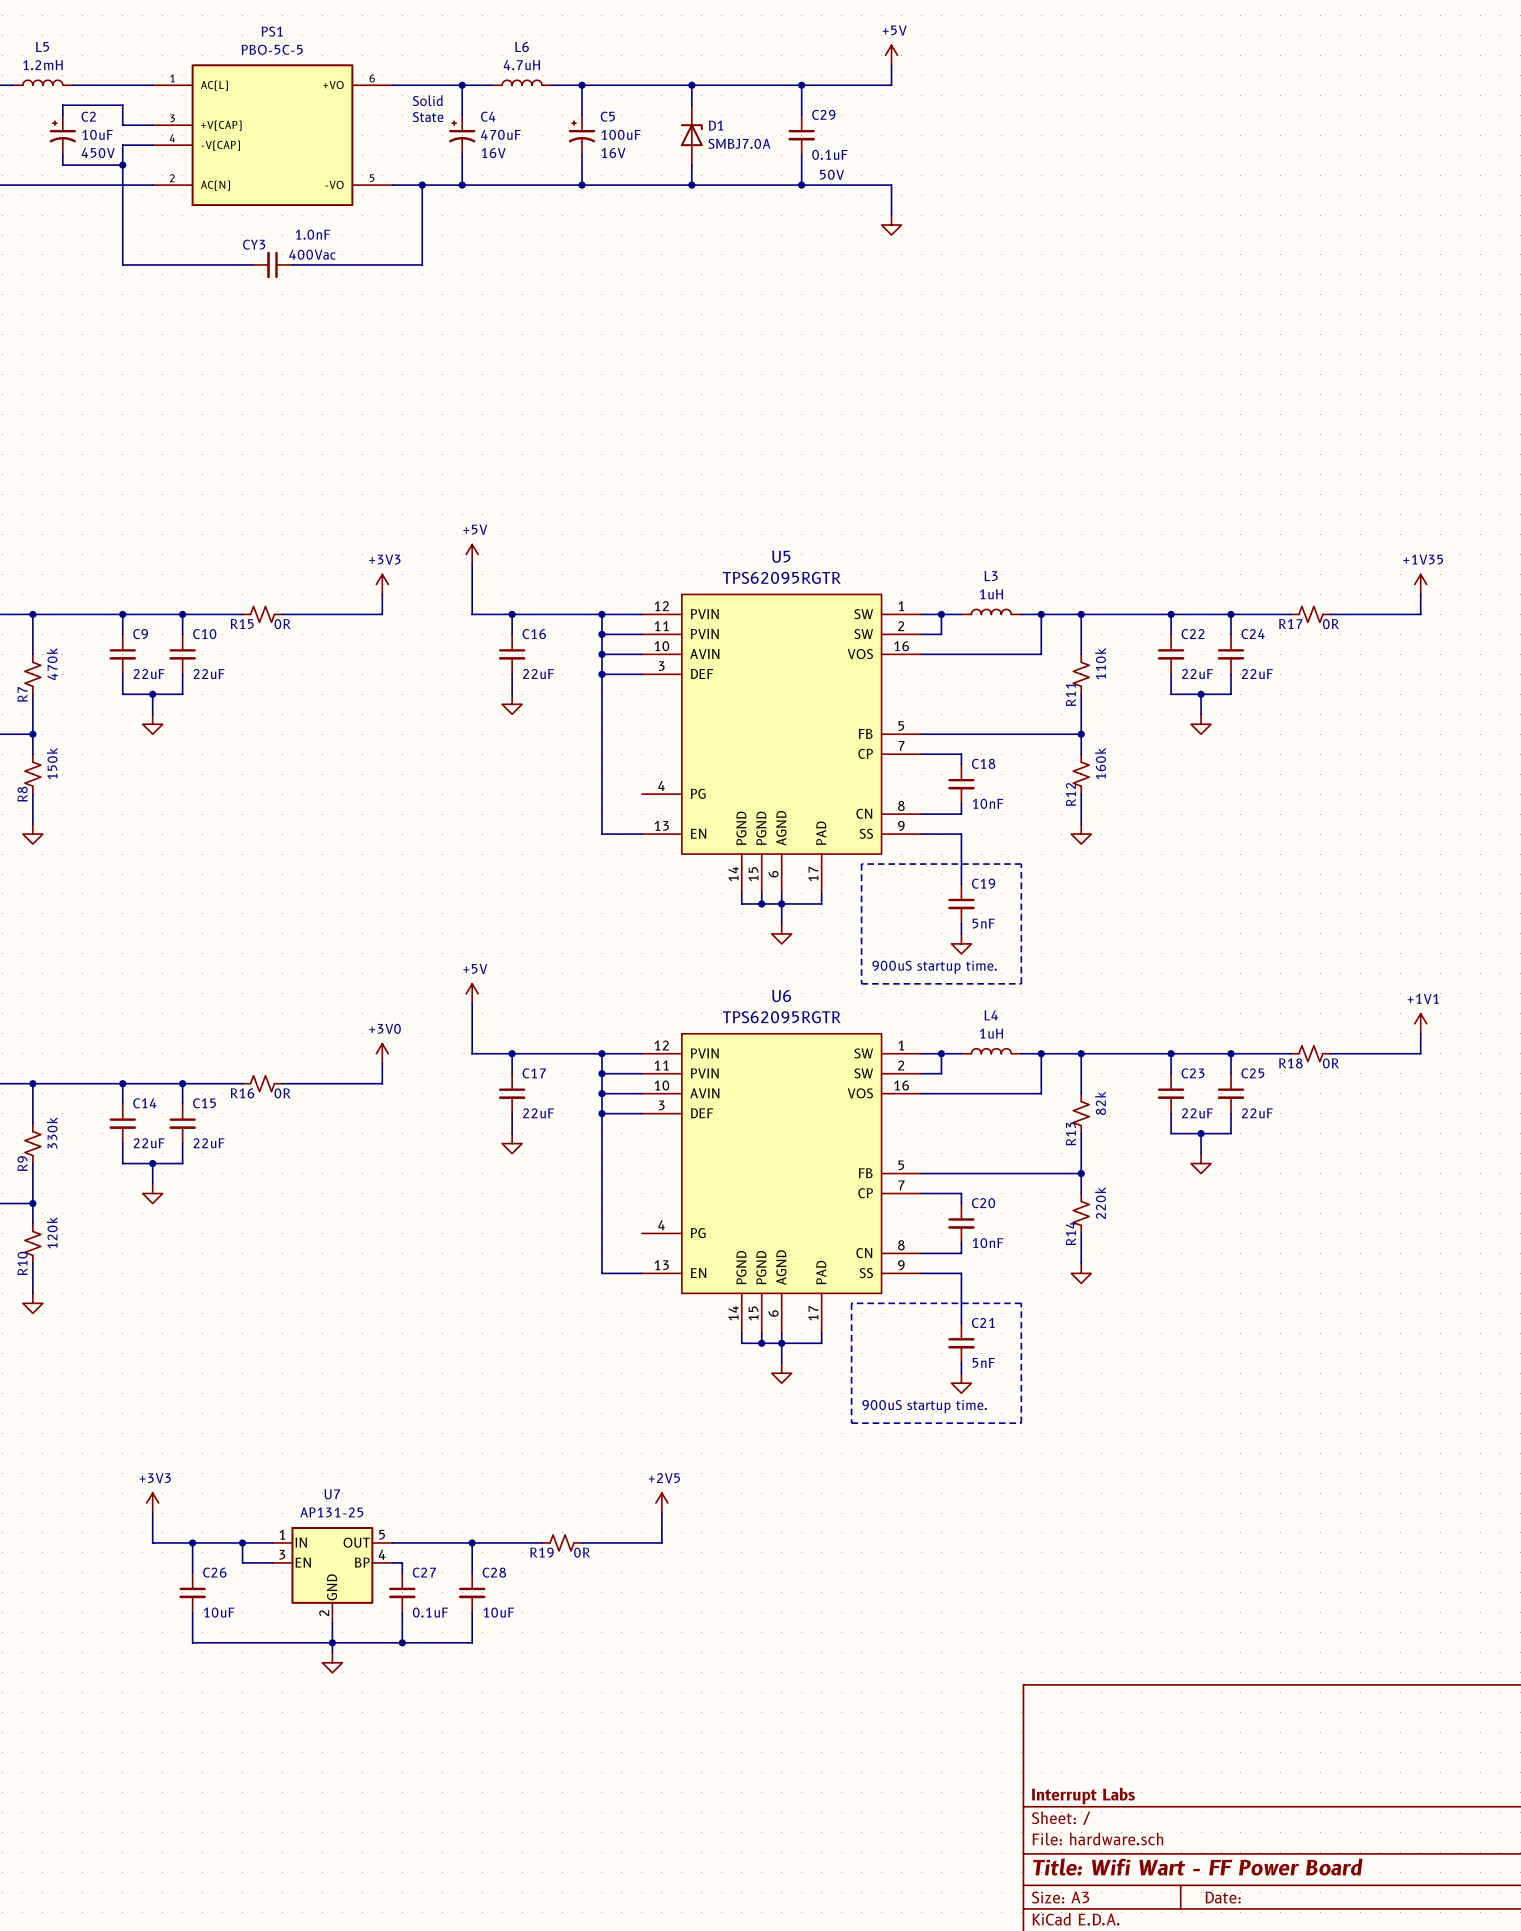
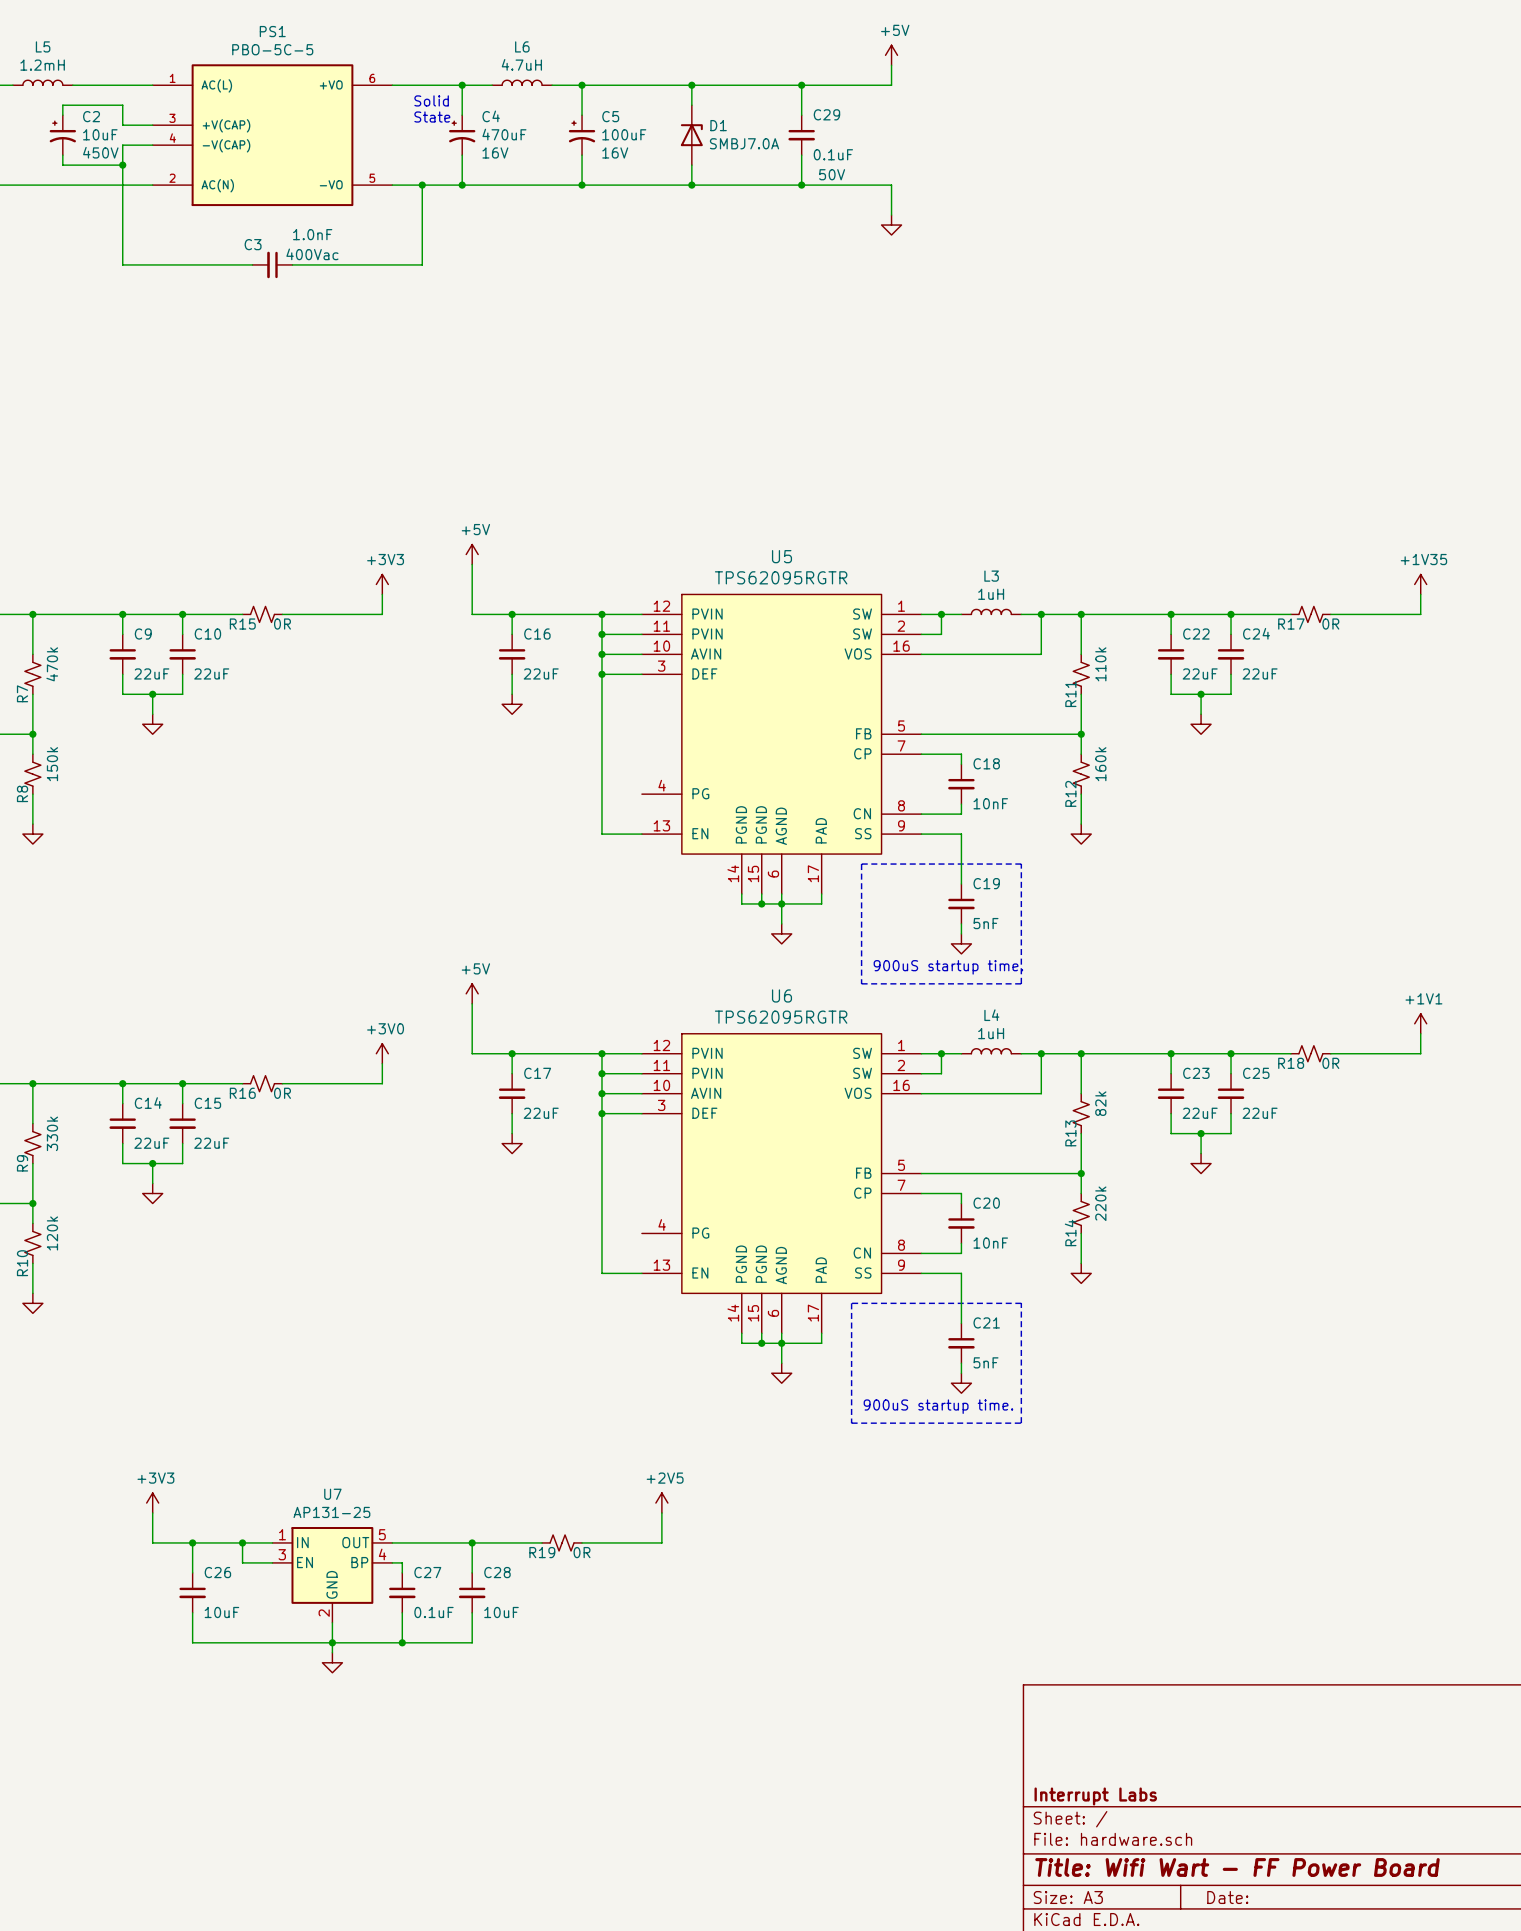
CY3 name: CY3 (254, 244) -> C3 (253, 244)

